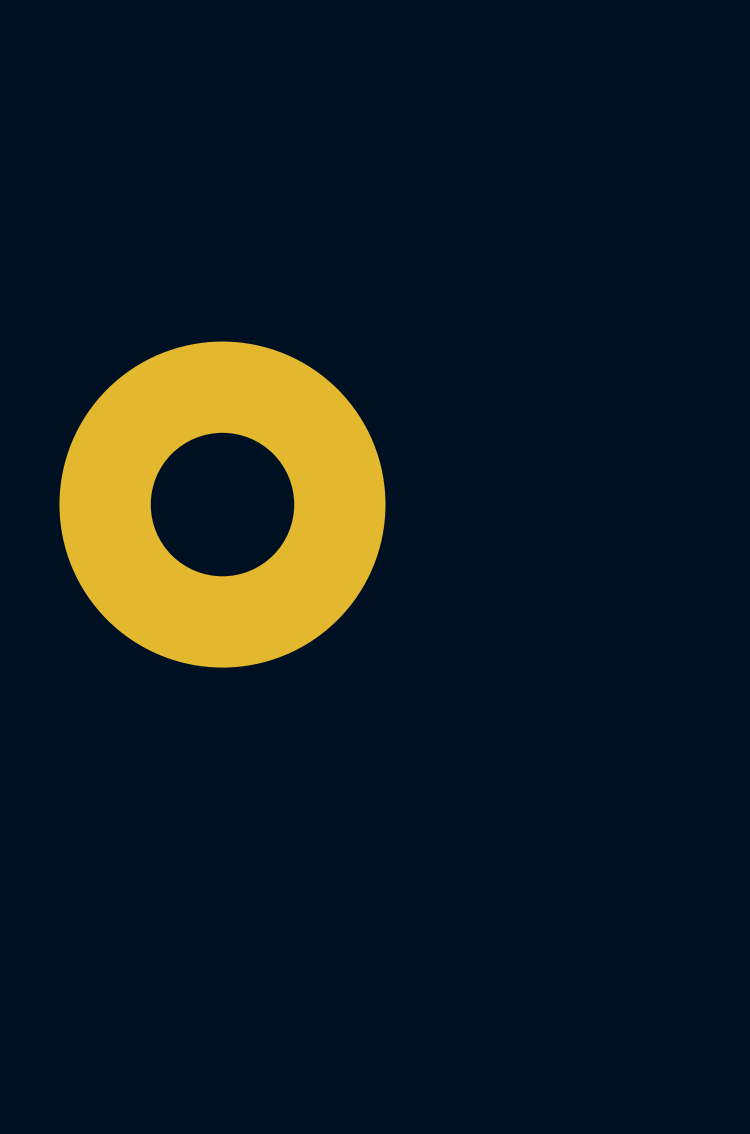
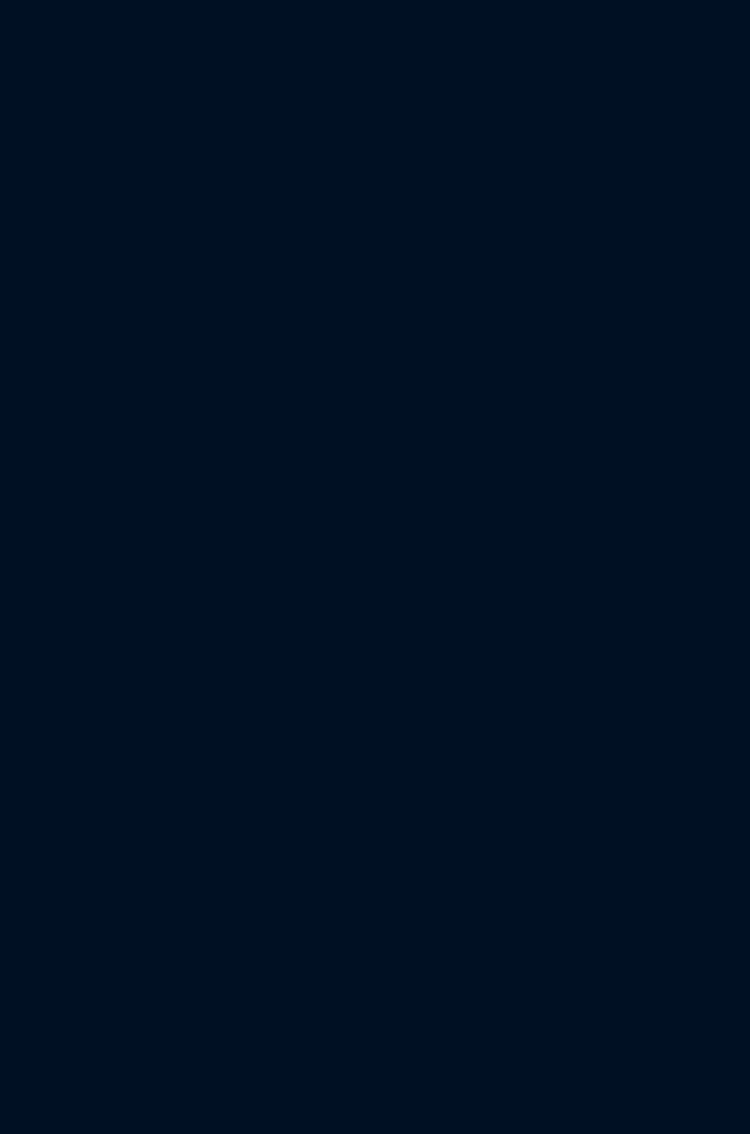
part: (222, 504) -> none

